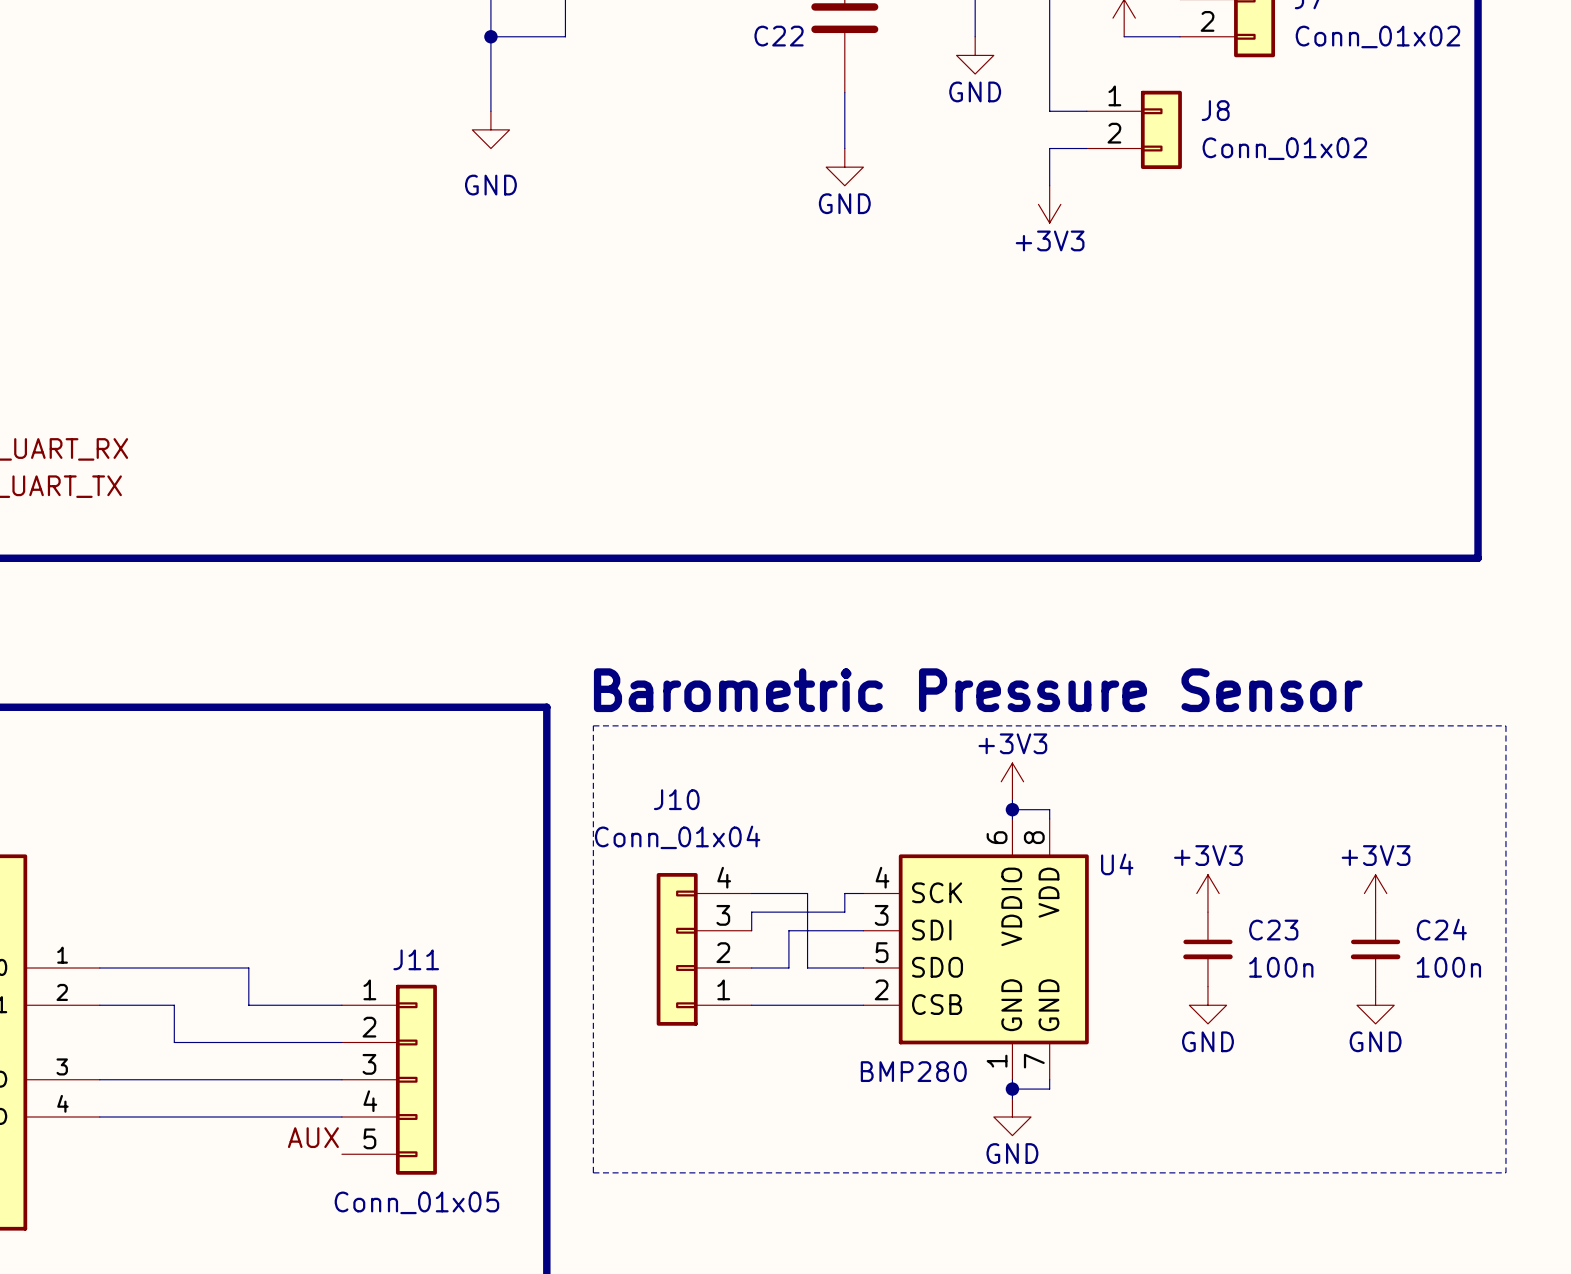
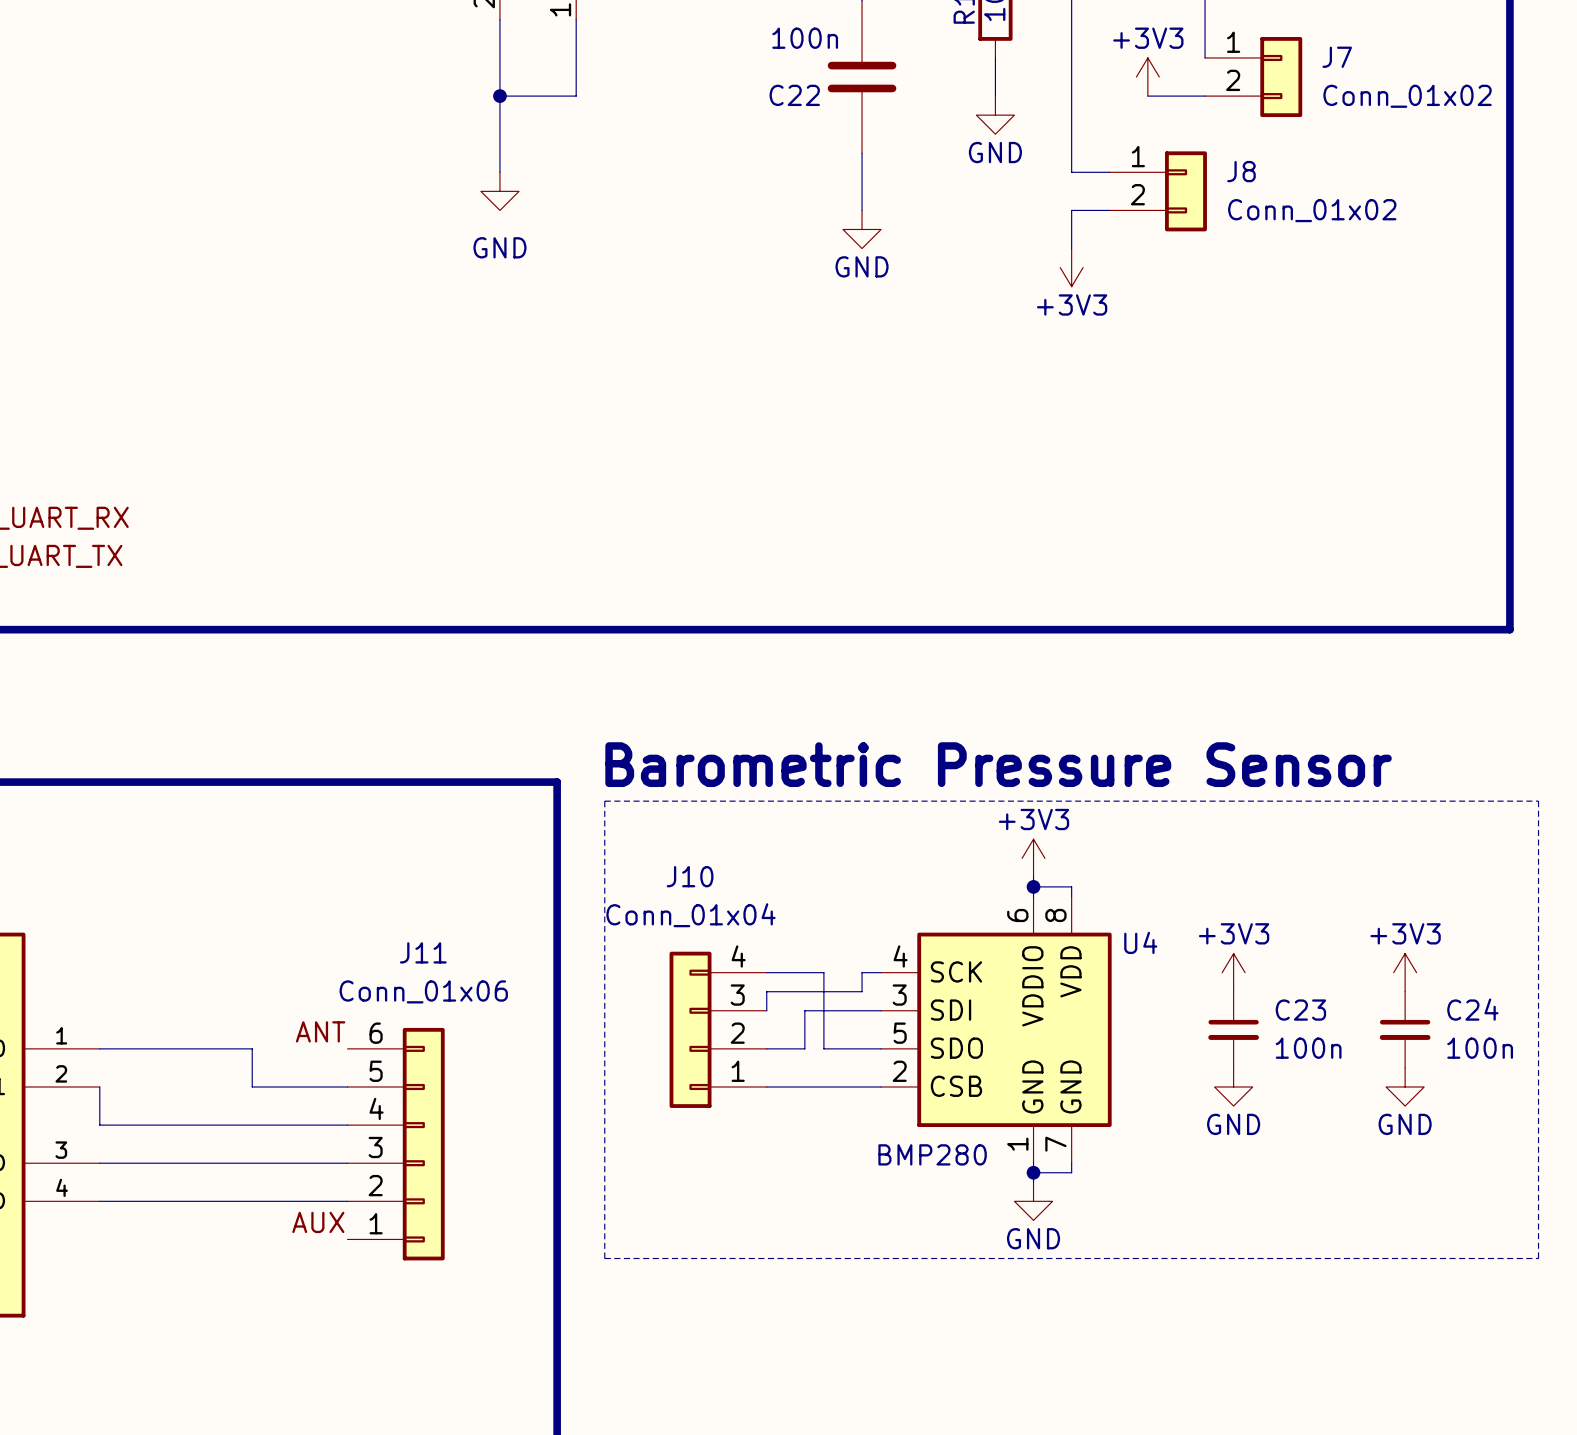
label: none -> ANT (320, 1031)
J11 name position: J11 (416, 959) -> J11 (423, 952)
J11 symbol: [341, 984, 437, 1175] -> [347, 1027, 445, 1261]
wire: (99, 1005) (174, 1005) (174, 1042) -> (99, 1086) (99, 1125) (176, 1125)
J11 value: Conn_01x05 (416, 1202) -> Conn_01x06 (423, 991)

